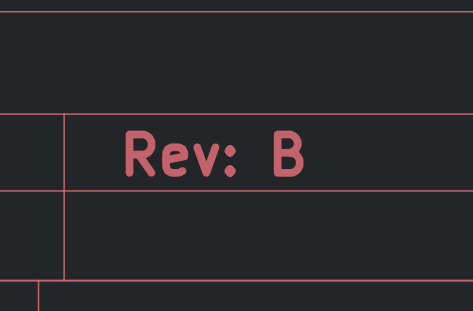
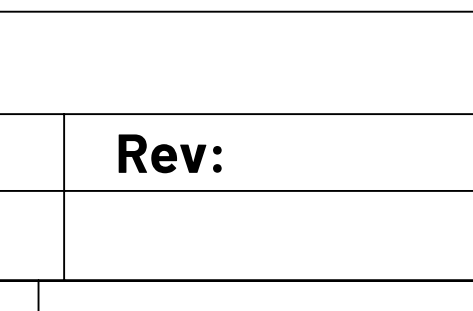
title block: Rev: B (214, 153) -> Rev: (170, 153)

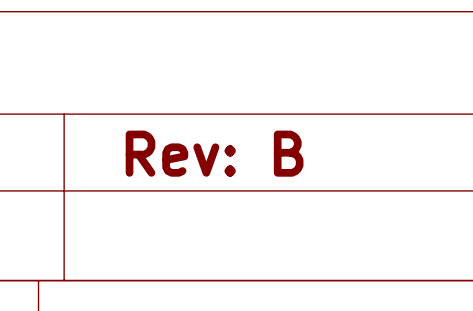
title block: Rev: (170, 153) -> Rev: B (214, 153)

